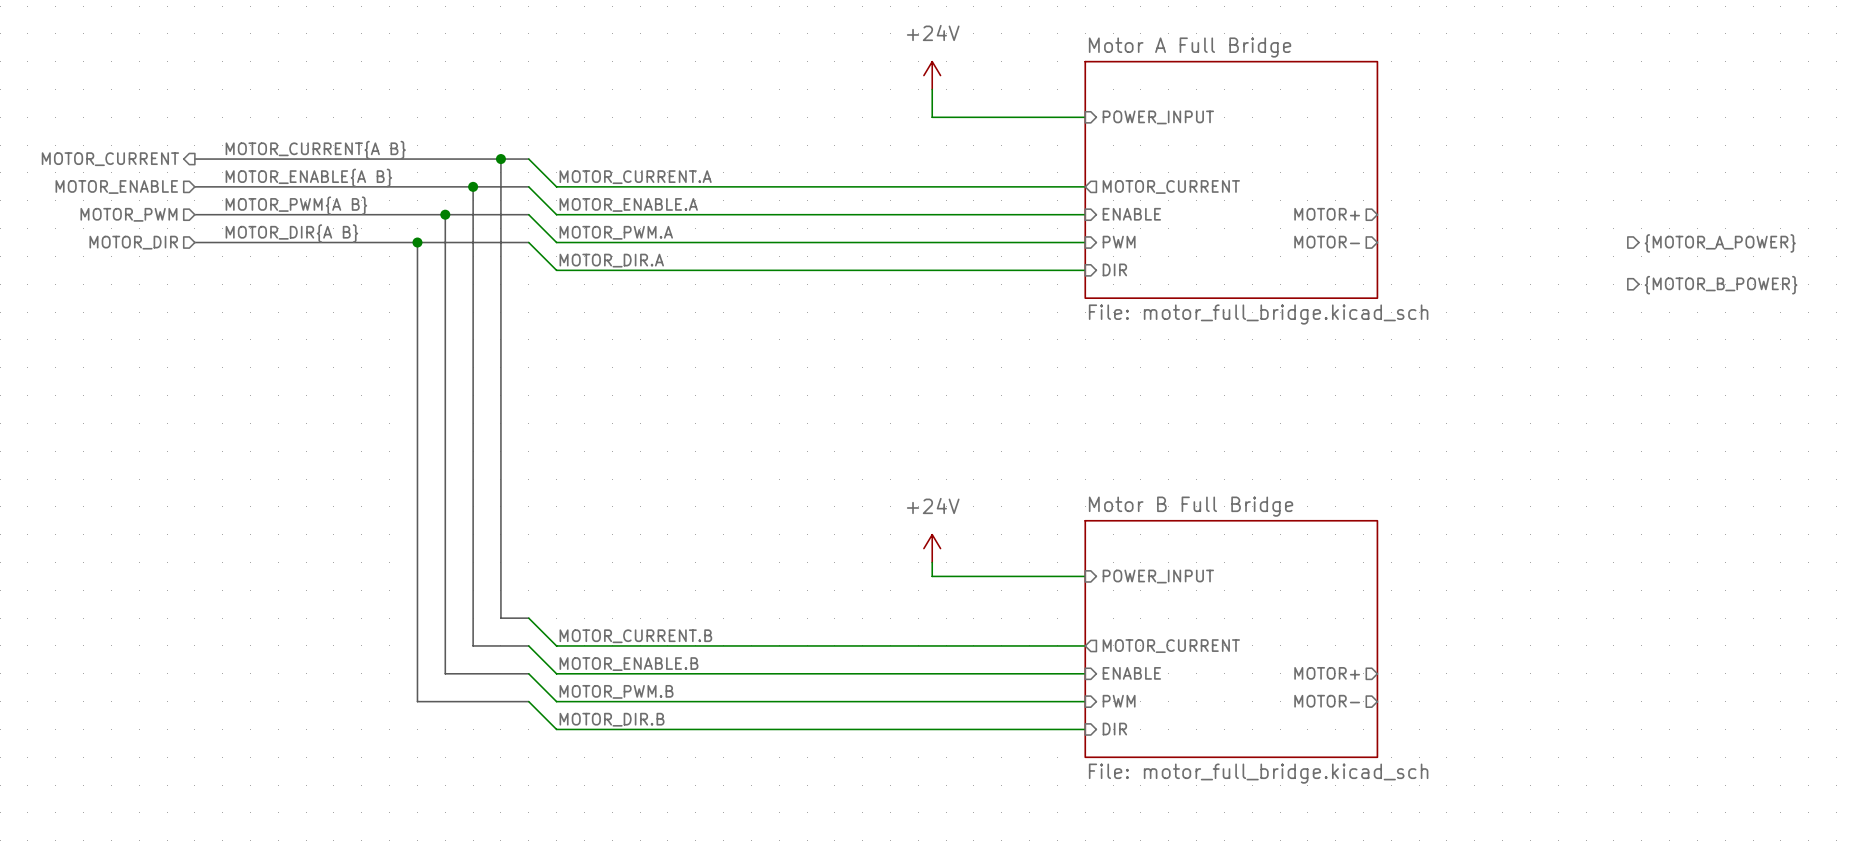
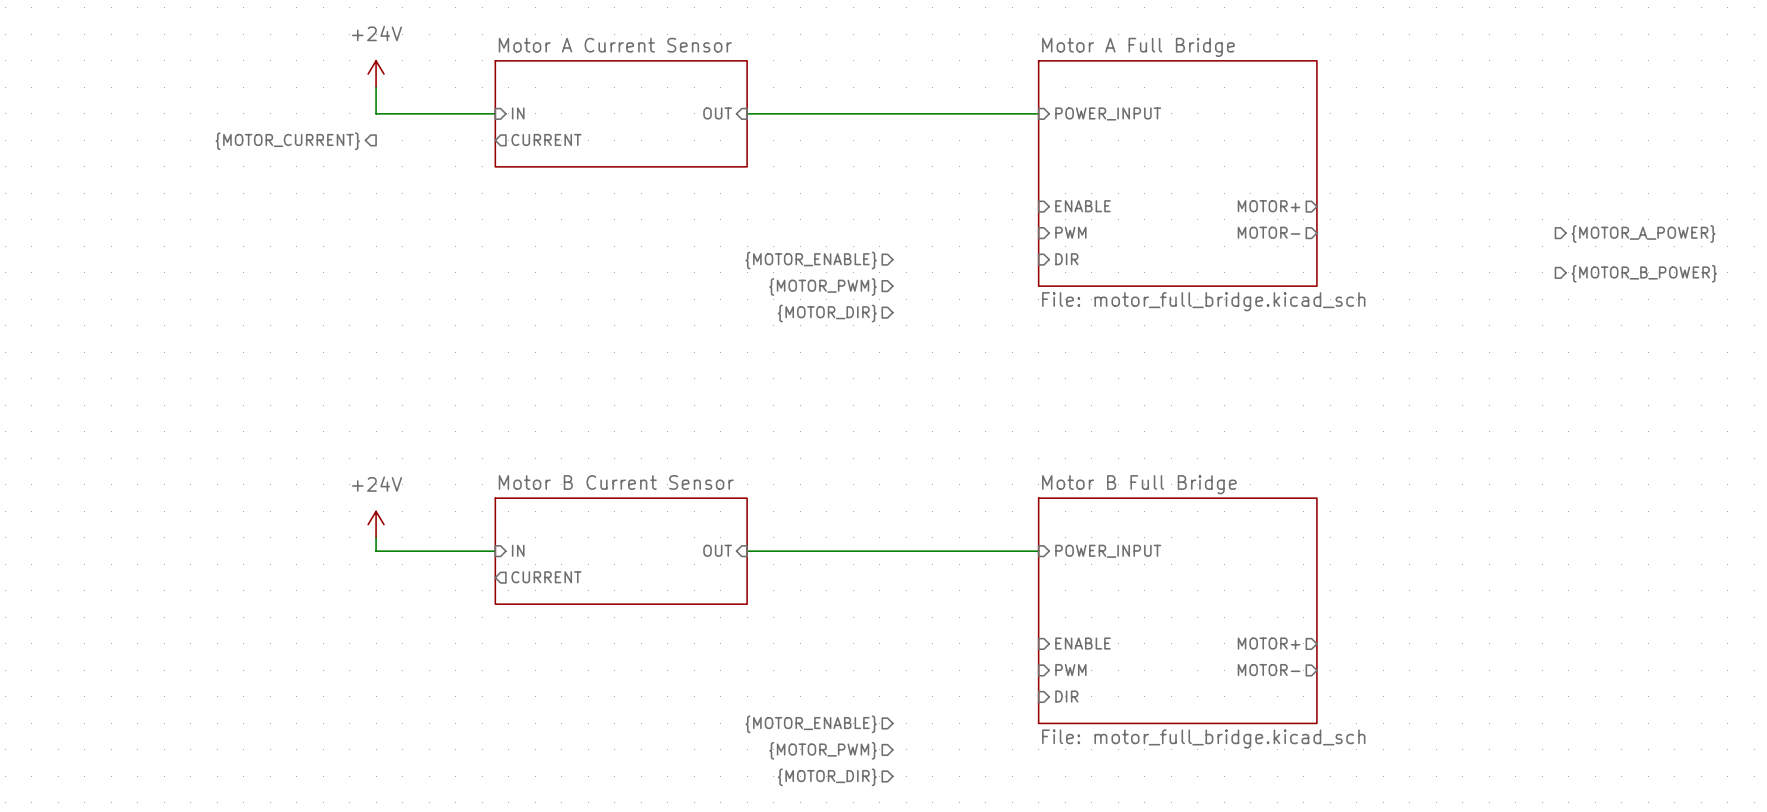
power symbol: none -> +24V (376, 74)
power symbol: +24V (932, 75) -> none
wire: none -> (376, 87) (376, 113) (495, 113)
wire: (932, 89) (932, 117) -> (747, 113) (892, 113)
sheet pin: none -> IN (518, 113)
sheet pin: none -> OUT (717, 113)
sheet Motor A Current Sensor: none -> (621, 113)
sheet pin: none -> CURRENT (546, 139)
hierarchical label: none -> {MOTOR_CURRENT} (287, 141)
label: MOTOR_CURRENT{A B} (315, 150) -> none
hierarchical label: MOTOR_CURRENT (110, 159) -> none
bus: (194, 159) (528, 159) -> none
bus: (500, 159) (500, 618) (528, 618) -> none
junction: (500, 159) -> none
wire: (528, 159) (556, 186) (1085, 186) -> none
label: MOTOR_ENABLE{A B} (308, 177) -> none
label: MOTOR_CURRENT.A (635, 177) -> none
hierarchical label: MOTOR_ENABLE (116, 186) -> none
bus: (194, 186) (528, 186) -> none
bus: (473, 186) (473, 645) (528, 645) -> none
junction: (473, 186) -> none
wire: (528, 186) (556, 214) (1085, 214) -> none
sheet pin: MOTOR_CURRENT (1171, 186) -> none
label: MOTOR_ENABLE.A (628, 204) -> none
label: MOTOR_PWM{A B} (296, 205) -> none
hierarchical label: MOTOR_PWM (128, 214) -> none
bus: (194, 214) (528, 214) -> none
bus: (445, 214) (445, 673) (528, 673) -> none
junction: (445, 214) -> none
wire: (528, 214) (556, 242) (1085, 242) -> none
label: MOTOR_PWM.A (616, 232) -> none
label: MOTOR_DIR{A B} (291, 233) -> none
hierarchical label: MOTOR_DIR (133, 242) -> none
bus: (194, 242) (528, 242) -> none
bus: (417, 242) (417, 701) (528, 701) -> none
junction: (417, 242) -> none
wire: (528, 242) (556, 270) (1085, 270) -> none
label: MOTOR_DIR.A (611, 260) -> none
hierarchical label: none -> {MOTOR_ENABLE} (811, 260)
hierarchical label: none -> {MOTOR_PWM} (823, 286)
hierarchical label: none -> {MOTOR_DIR} (827, 313)
power symbol: none -> +24V (376, 524)
power symbol: +24V (932, 548) -> none
wire: none -> (376, 537) (376, 551) (495, 551)
wire: (932, 562) (932, 576) -> (747, 551) (892, 551)
sheet pin: none -> IN (518, 550)
sheet Motor B Current Sensor: none -> (621, 551)
sheet pin: none -> OUT (717, 550)
sheet pin: none -> CURRENT (546, 577)
wire: (528, 618) (556, 645) (1085, 645) -> none
label: MOTOR_CURRENT.B (635, 636) -> none
wire: (528, 645) (556, 673) (1085, 673) -> none
sheet pin: MOTOR_CURRENT (1171, 646) -> none
label: MOTOR_ENABLE.B (628, 664) -> none
wire: (528, 673) (556, 701) (1085, 701) -> none
label: MOTOR_PWM.B (616, 691) -> none
wire: (528, 701) (556, 729) (1085, 729) -> none
label: MOTOR_DIR.B (612, 719) -> none
hierarchical label: none -> {MOTOR_ENABLE} (811, 724)
hierarchical label: none -> {MOTOR_PWM} (823, 750)
hierarchical label: none -> {MOTOR_DIR} (827, 777)

